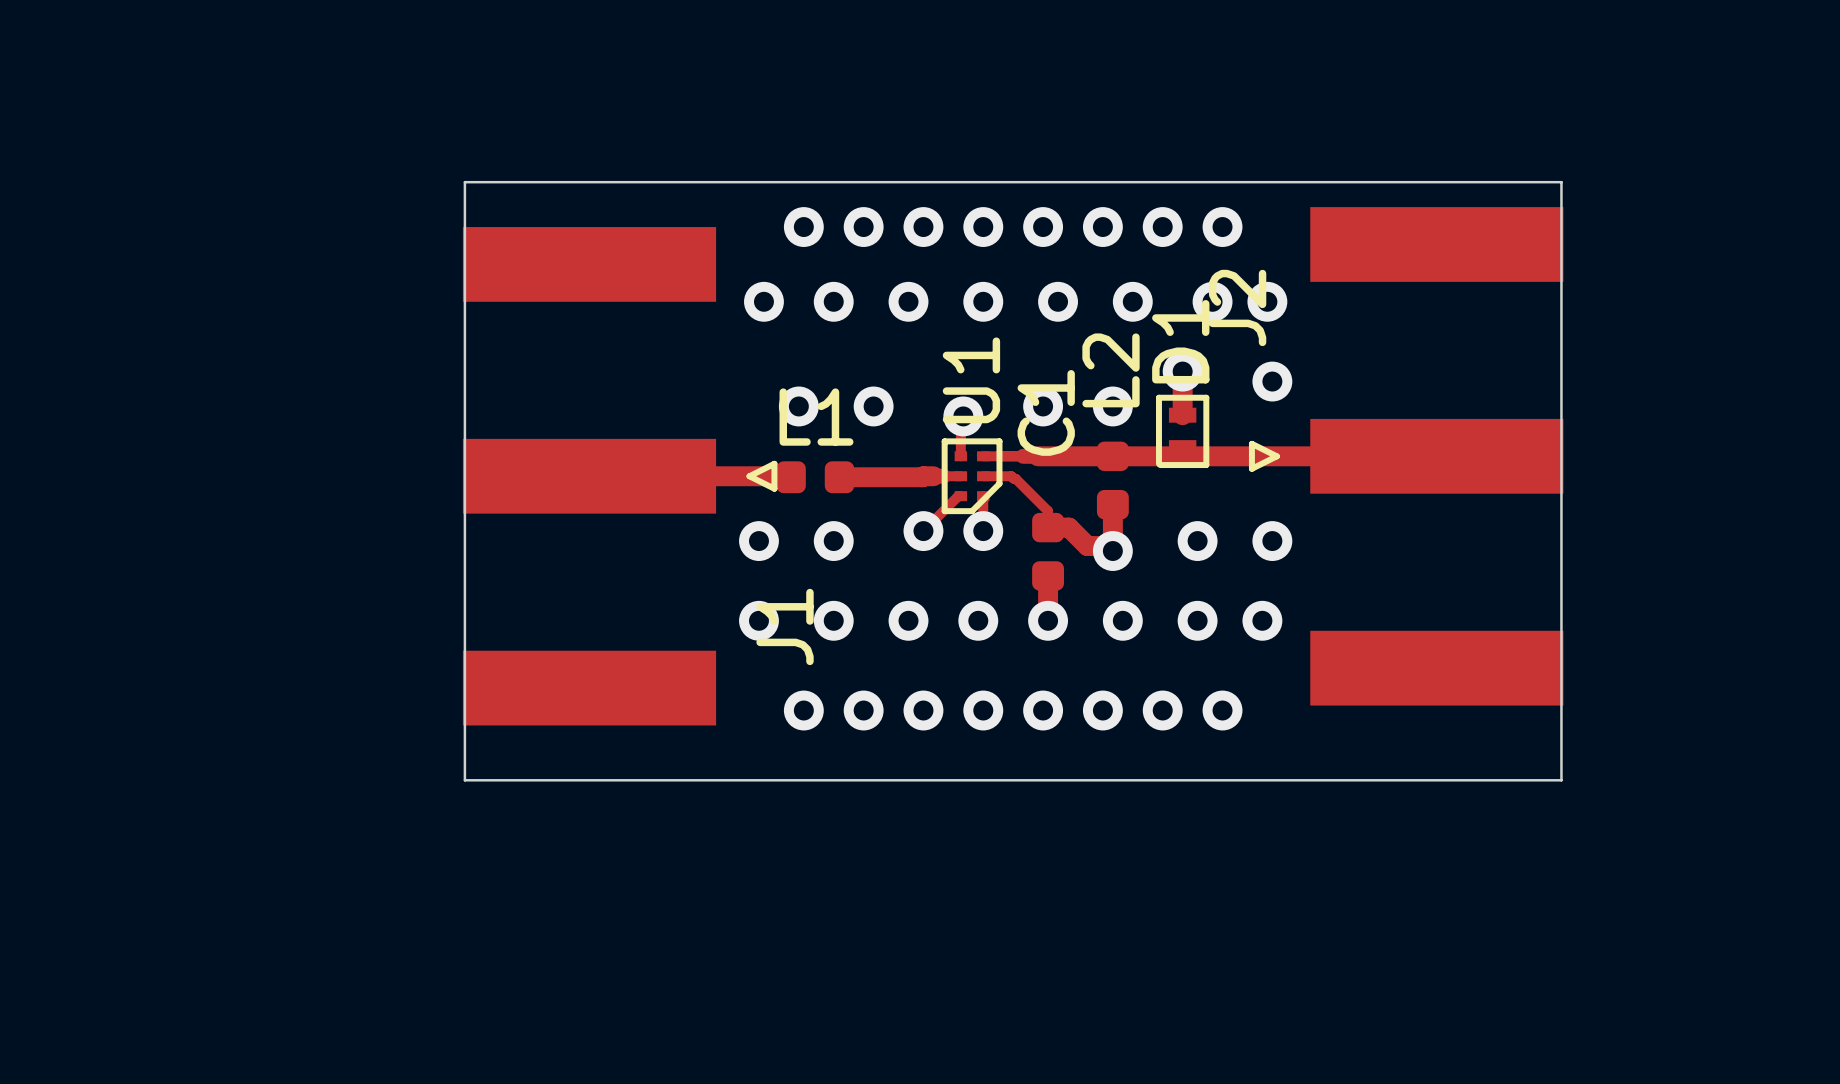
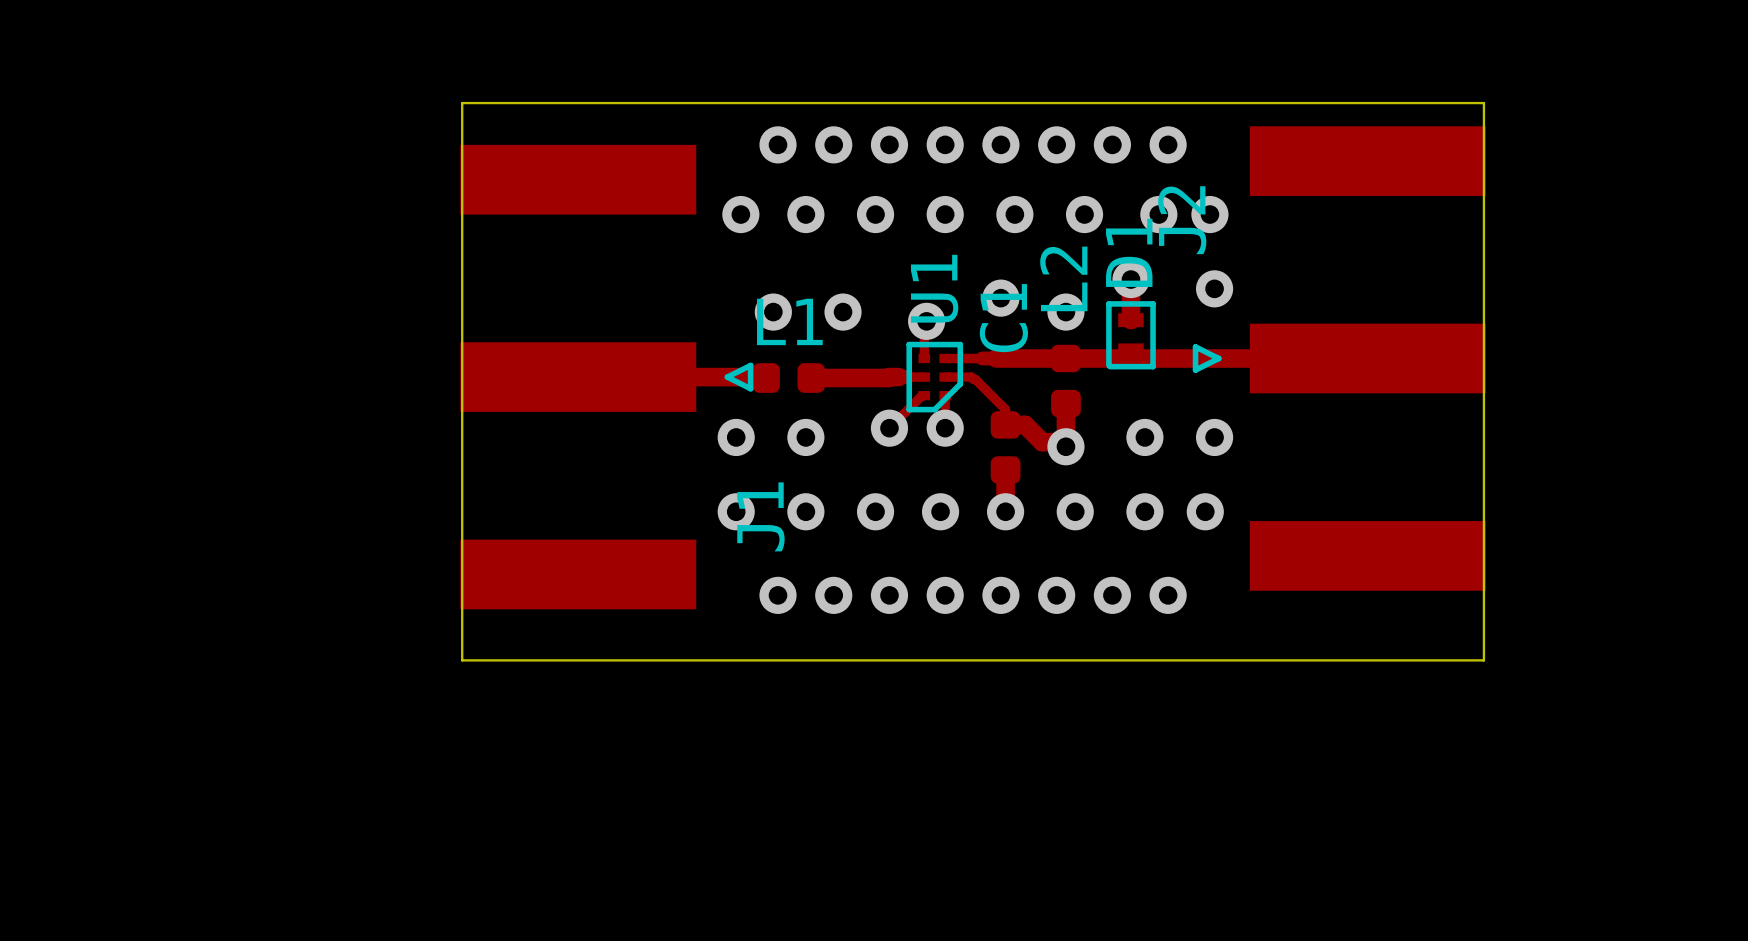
via position: (1043, 406) -> (1000, 298)

